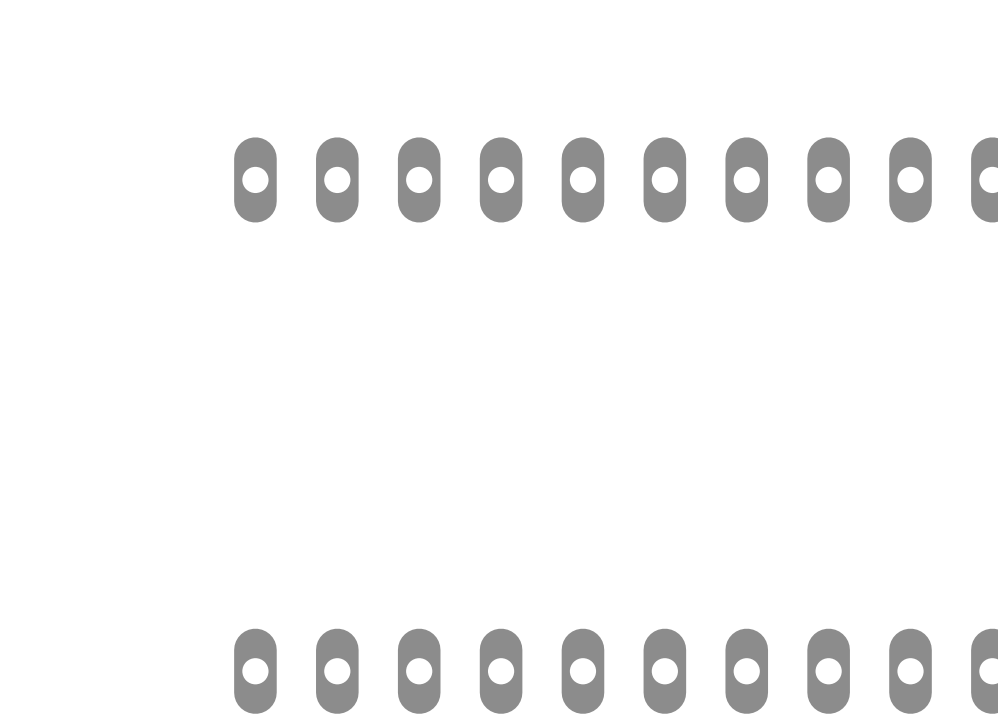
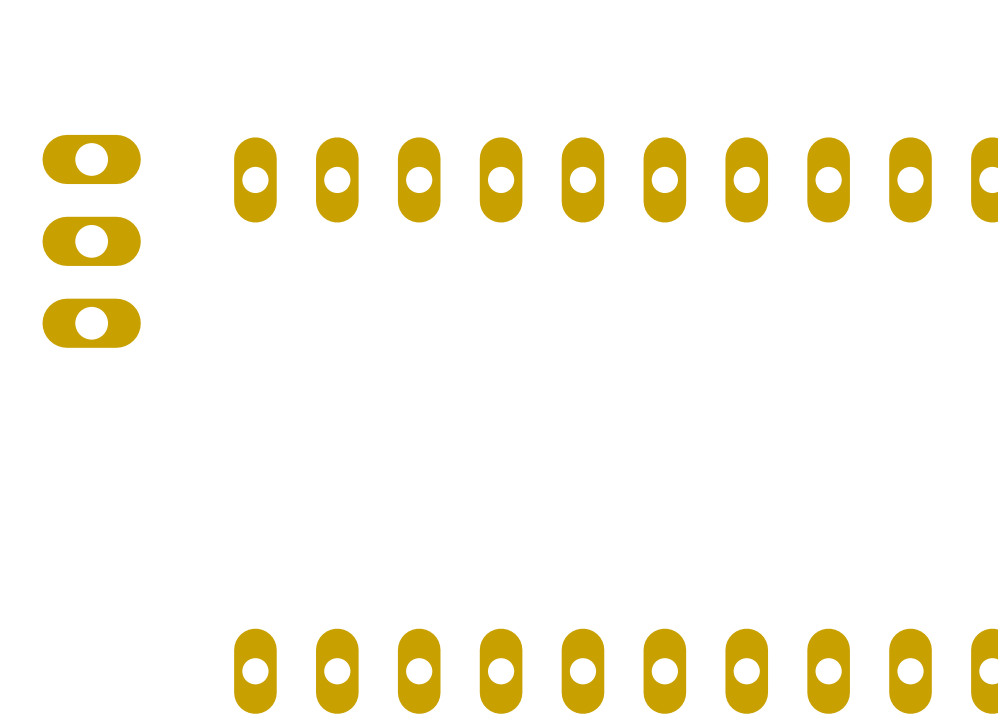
part: none -> (91, 241)

